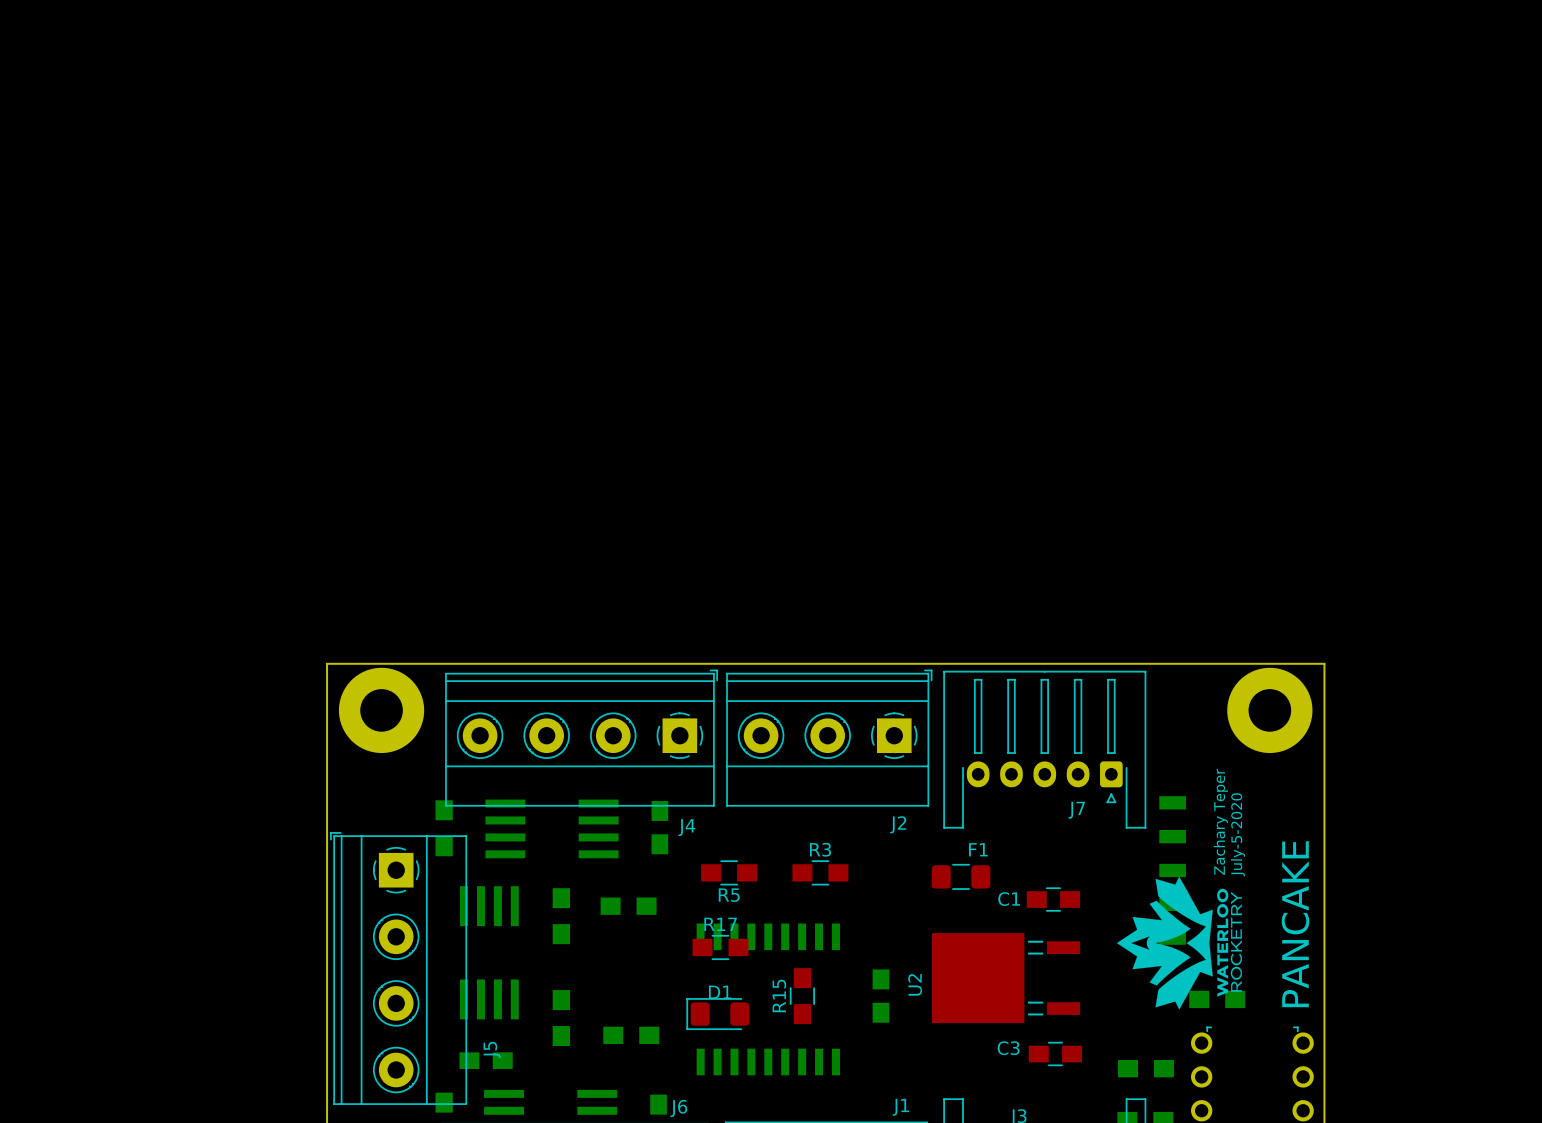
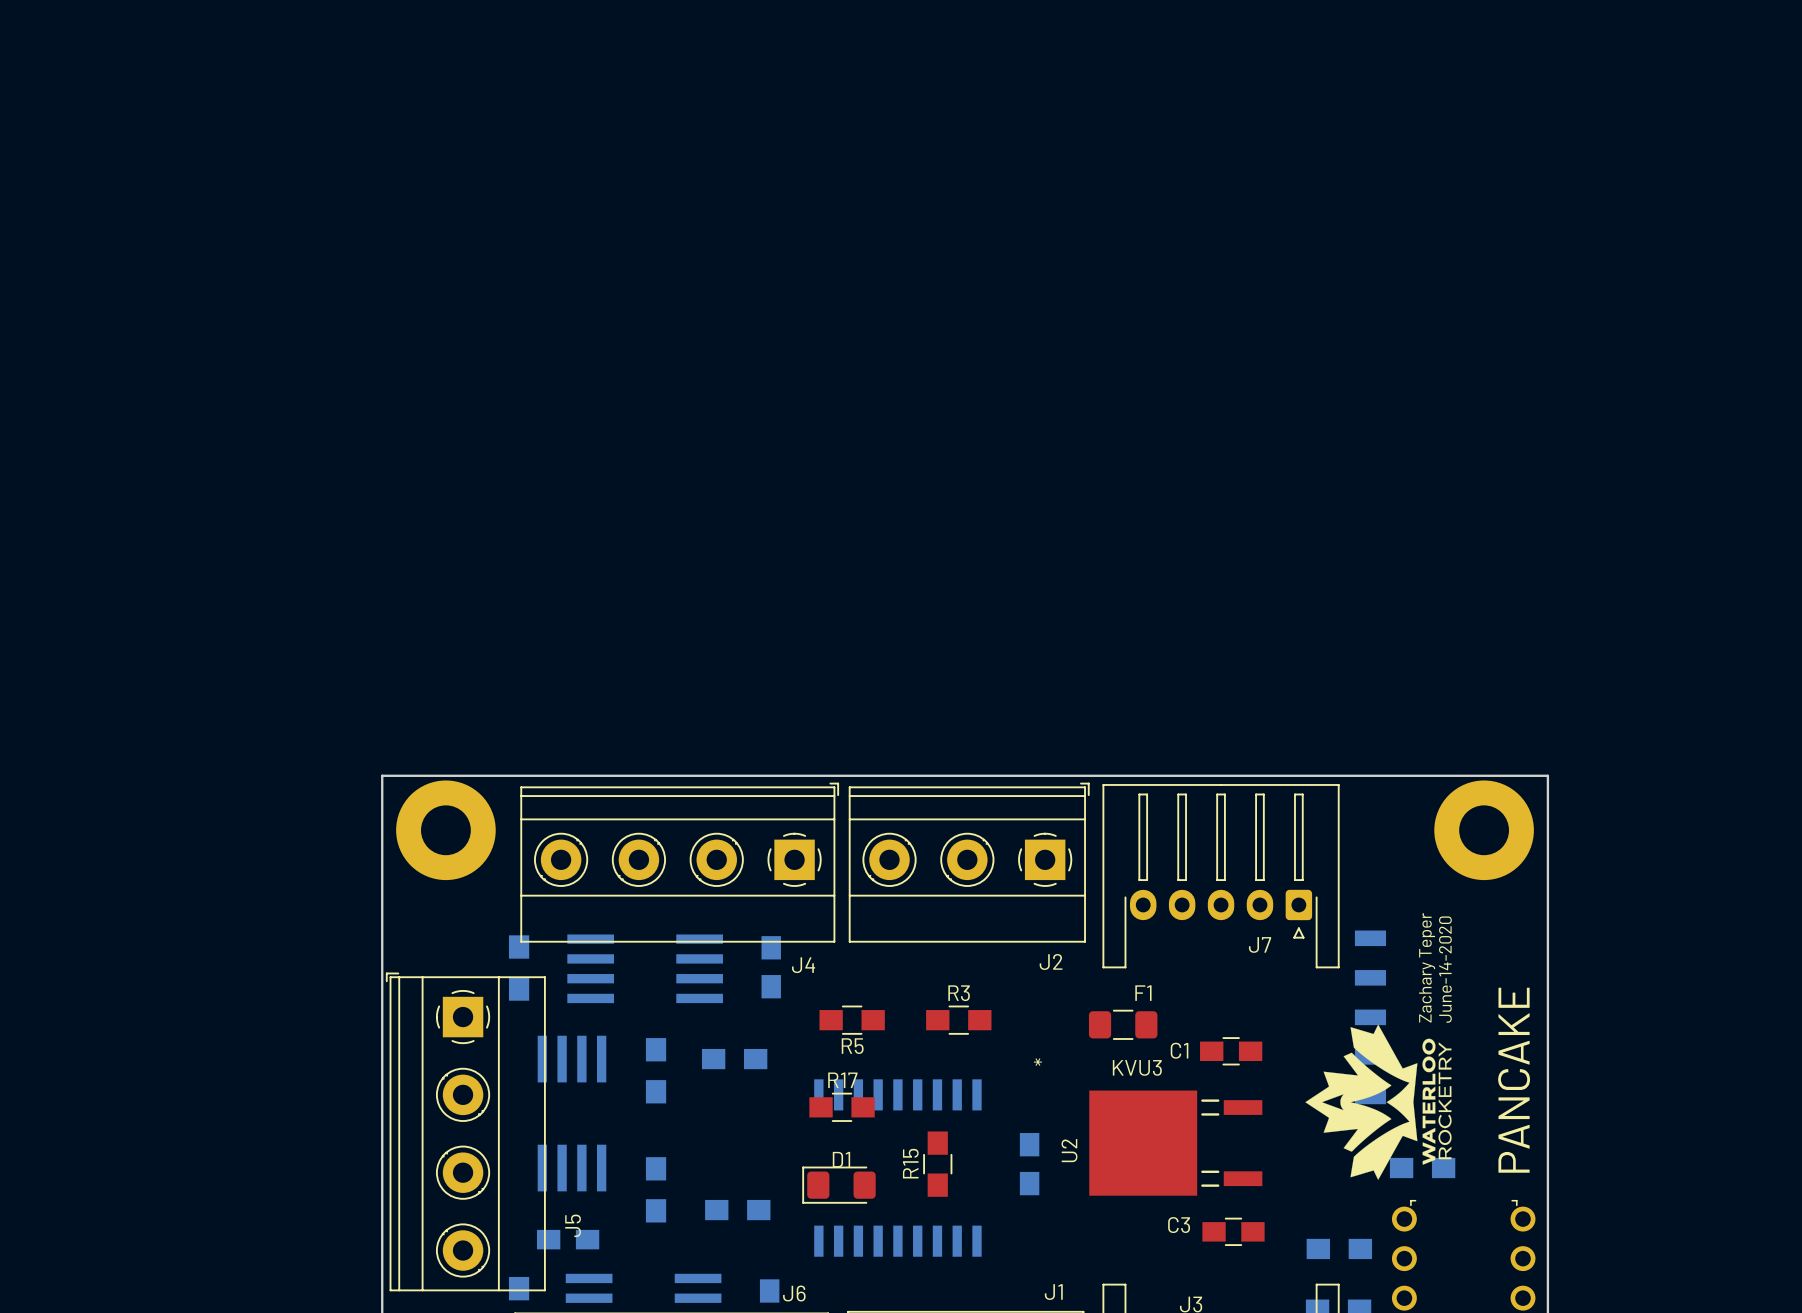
text: July-5-2020 (1238, 834) -> June-14-2020 (1445, 969)
U2 text: none -> * (1037, 1062)
U2 value: none -> KVU3 (1137, 1067)

